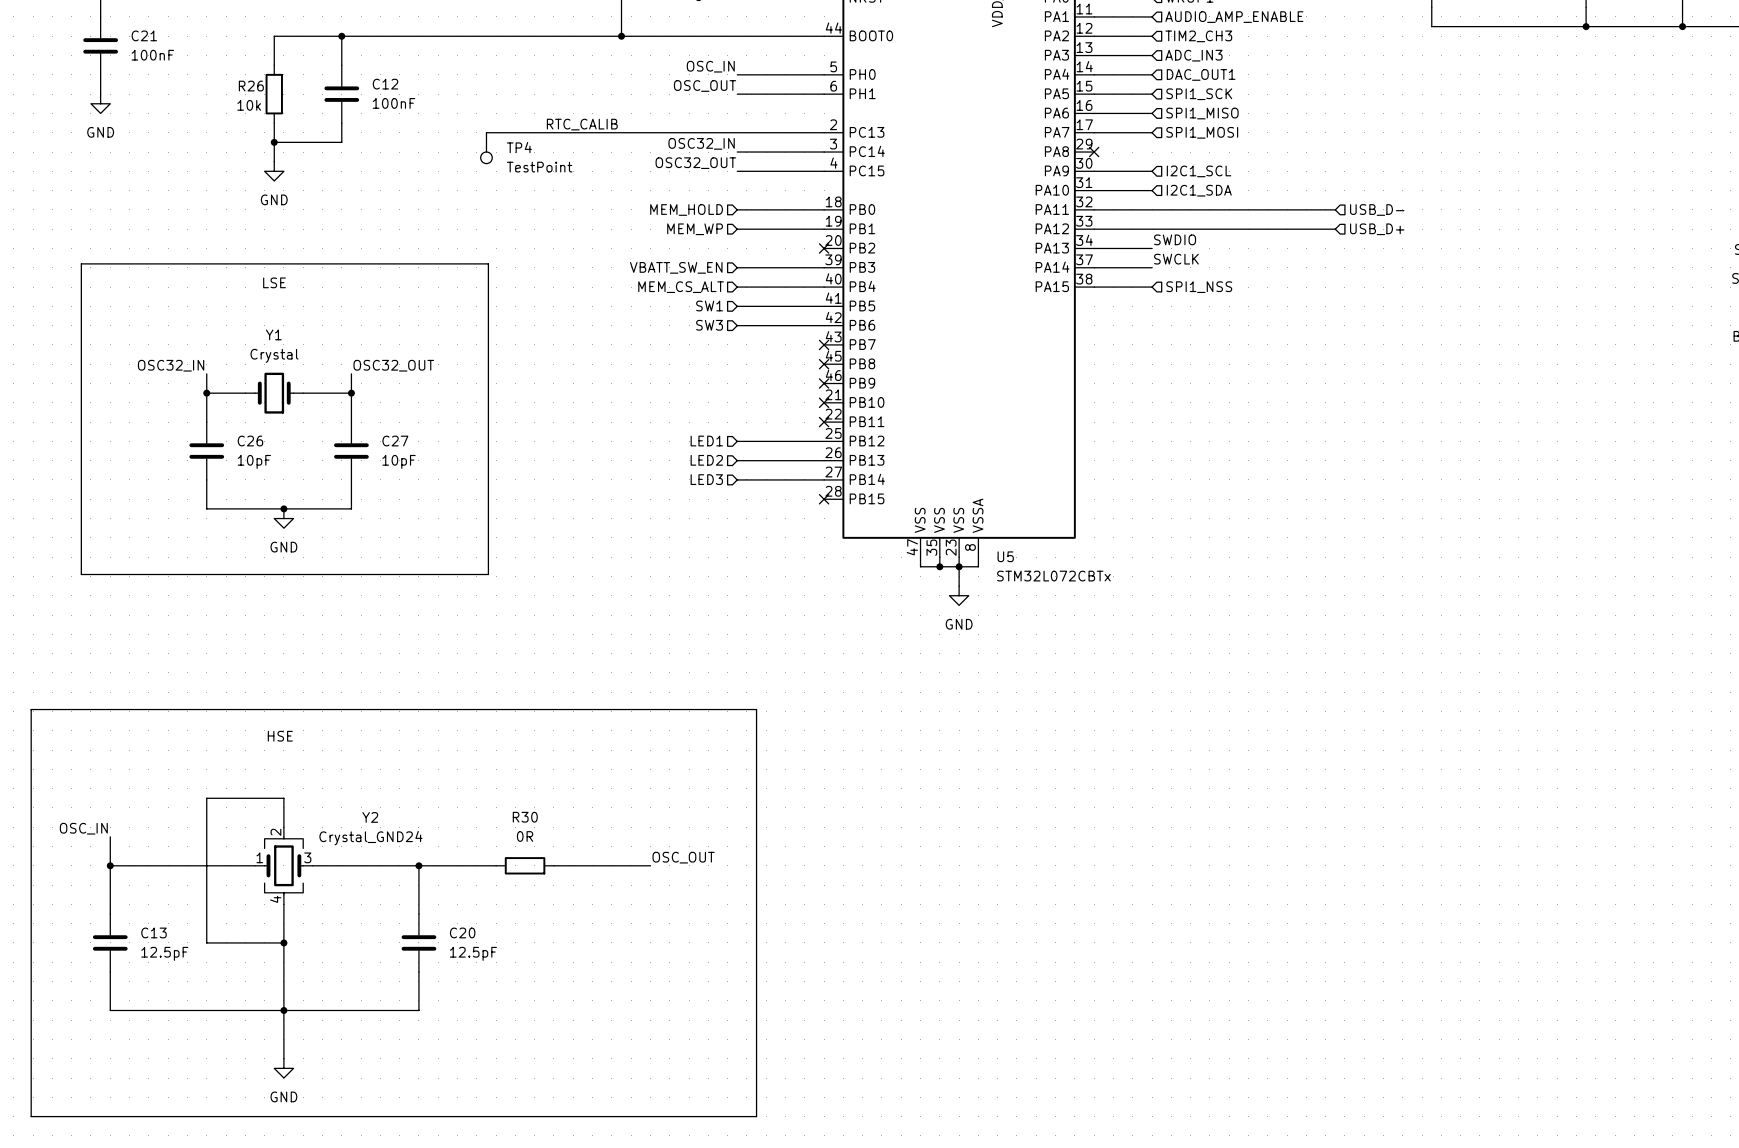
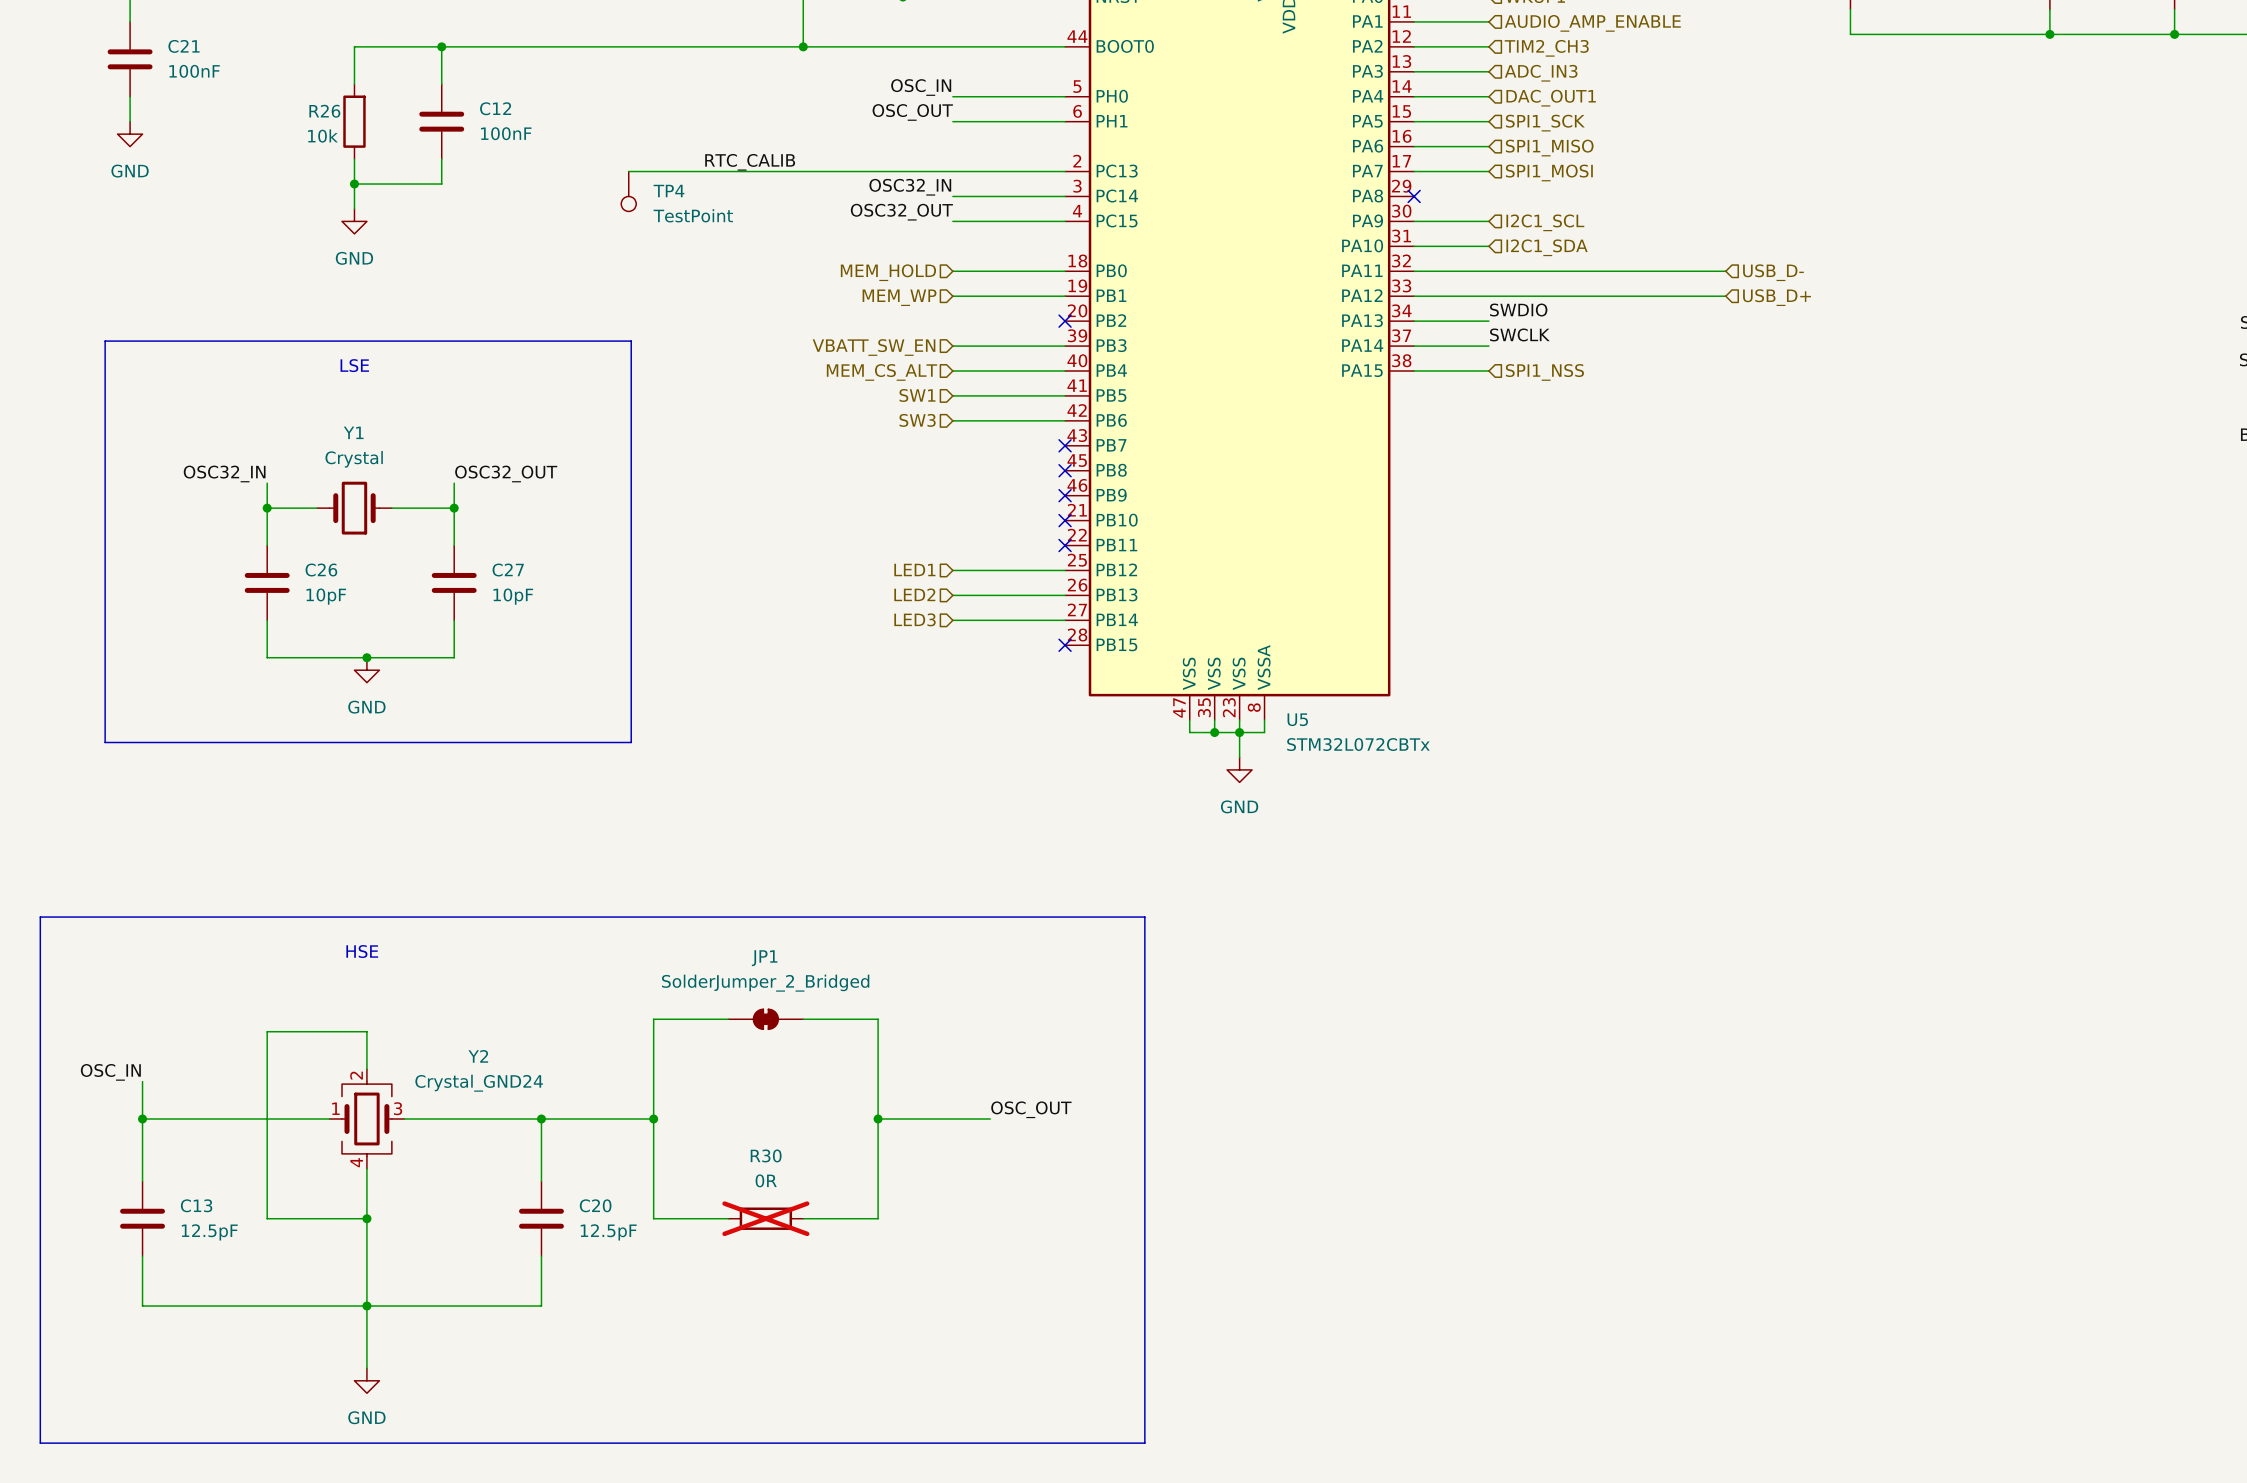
line: (756, 709) (756, 1116) -> (977, 917) (1144, 917) (1144, 1443) (977, 1443)
wire: none -> (728, 1019) (653, 1019) (653, 1218) (728, 1218)
JP1: none -> SolderJumper_2_Bridged (765, 1019)
wire: none -> (803, 1019) (878, 1019) (878, 1218) (803, 1218)
label position: OSC_OUT (683, 857) -> OSC_OUT (1031, 1109)
junction: none -> (653, 1118)
R30 position: (525, 865) -> (765, 1218)
wire: (553, 865) (650, 865) -> none
wire: none -> (878, 1118) (990, 1118)
junction: none -> (878, 1118)
R30 do-not-place cross: none -> (765, 1218)

